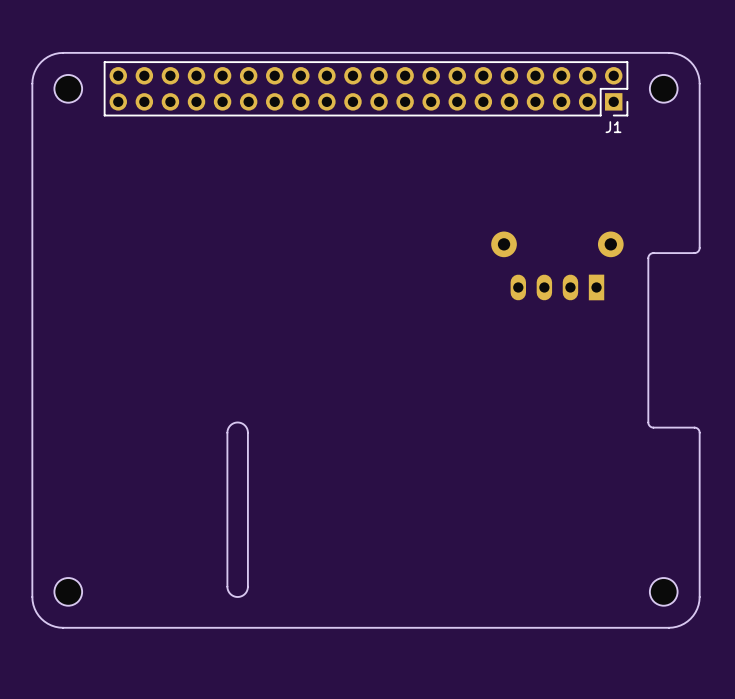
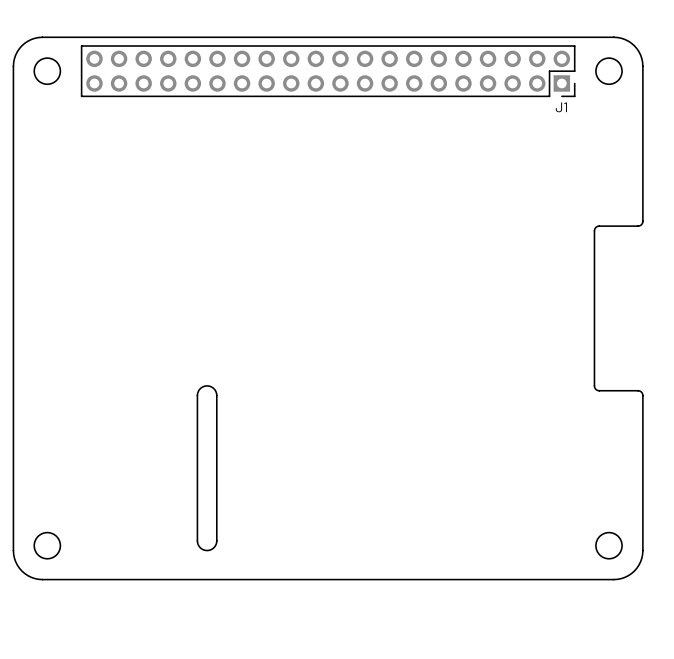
part: (557, 265) -> none

